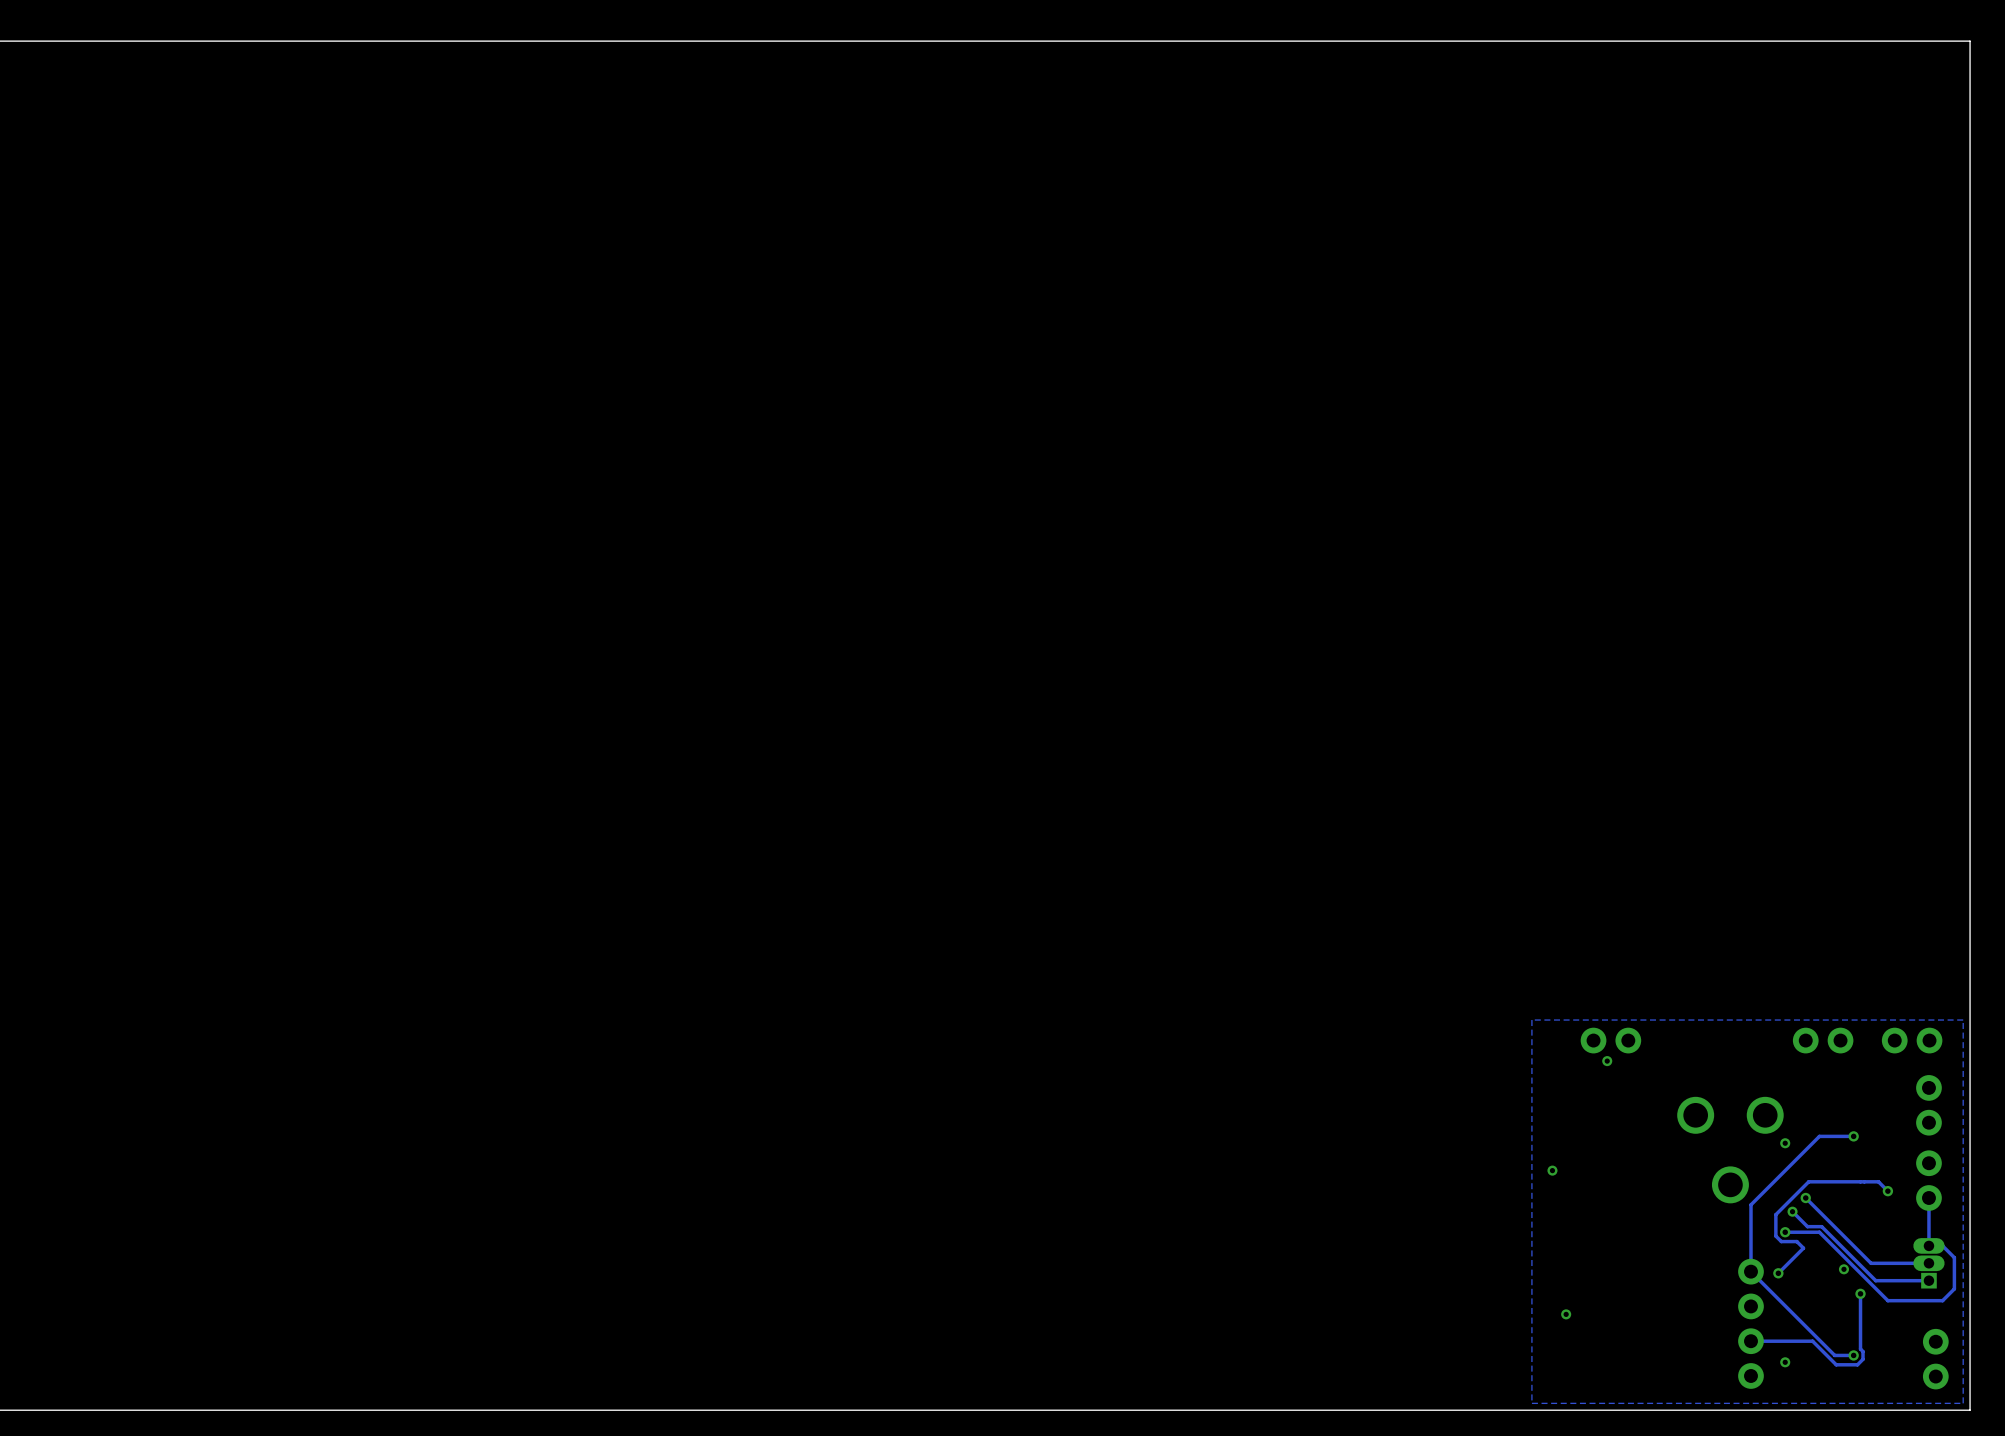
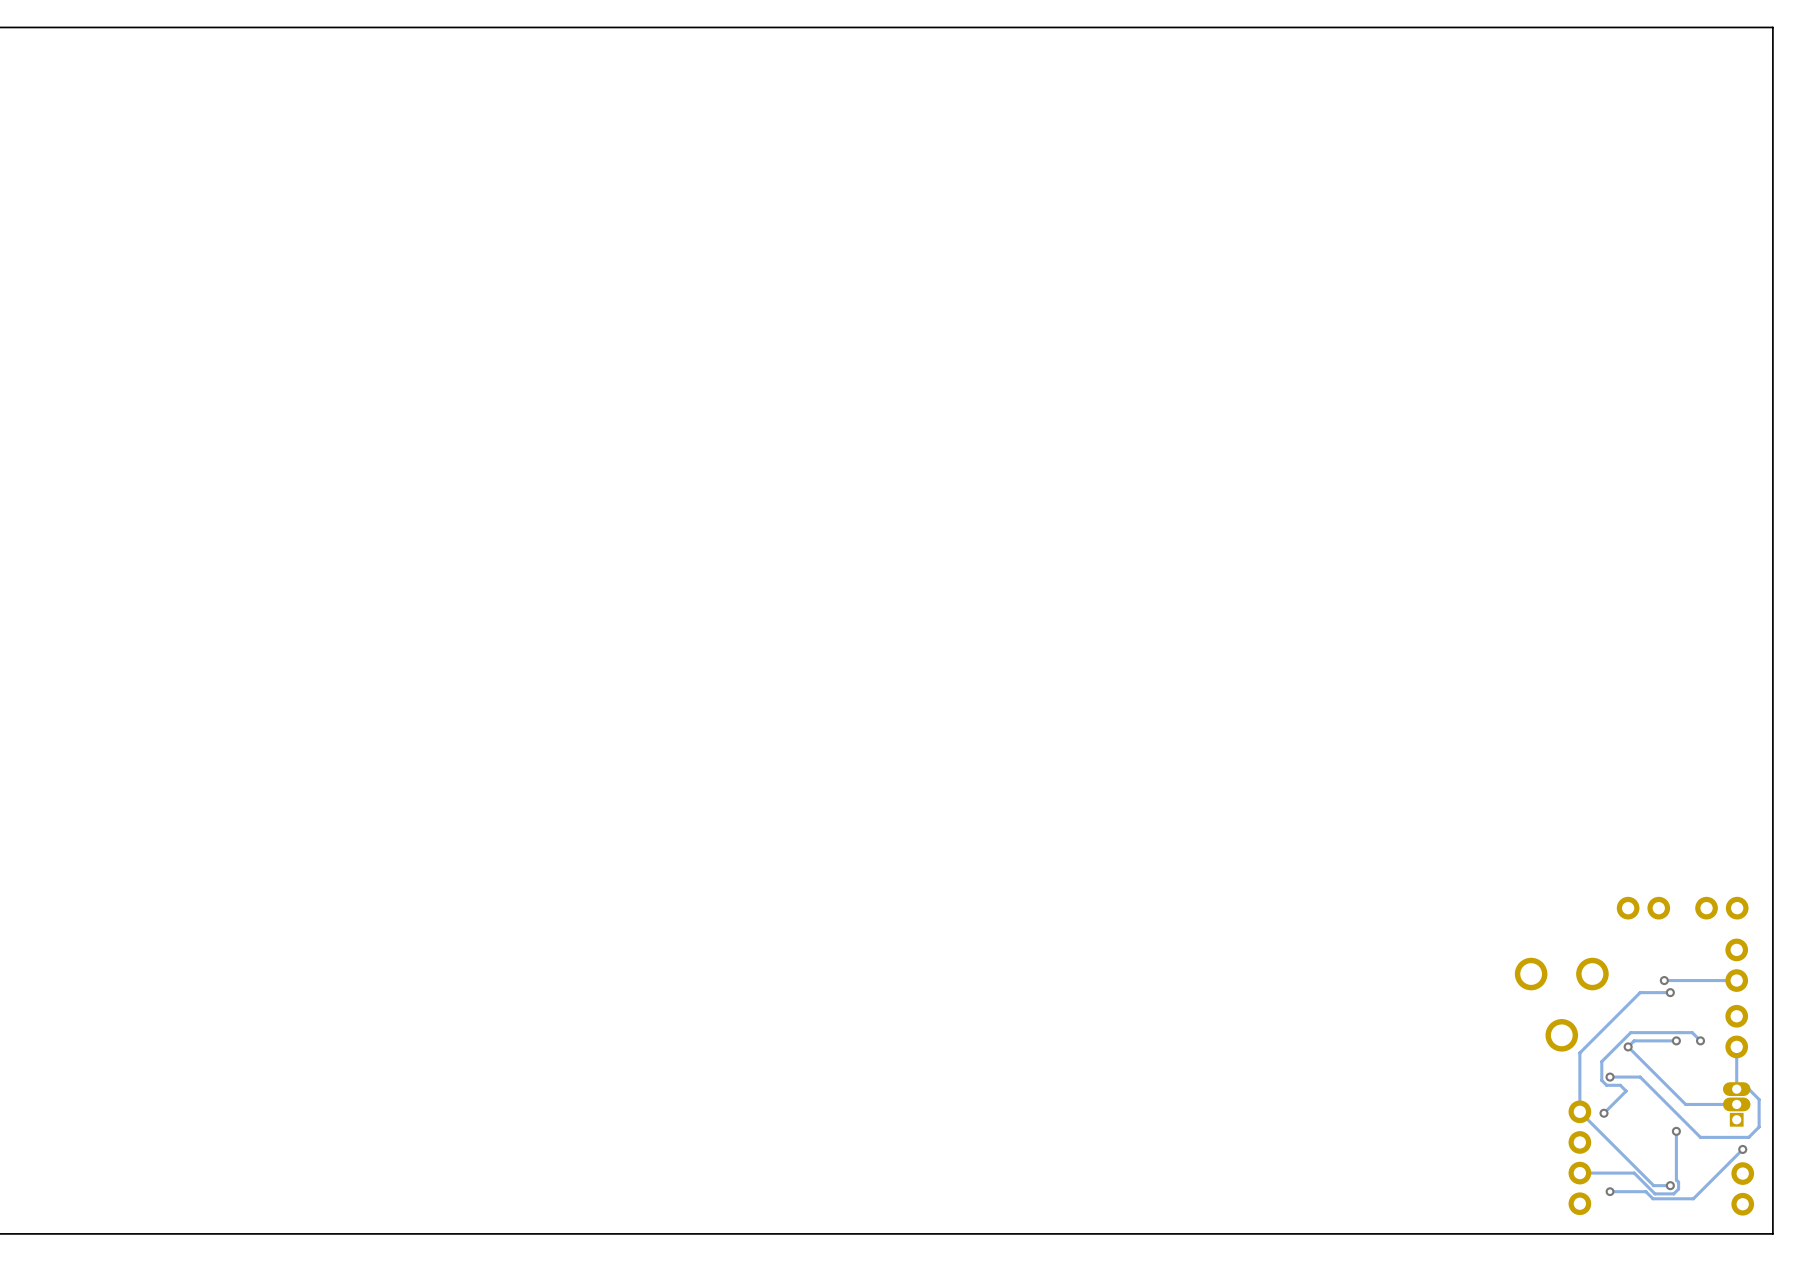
zone outline: (1963, 1020) (1531, 1020) (1531, 1403) (1963, 1403) (1963, 1020) -> none
part: (1610, 1040) -> none
via: (1607, 1061) -> none
via: none -> (1664, 980)
track: none -> (1736, 980) (1664, 980)
via: (1785, 1143) -> none
via: (1552, 1170) -> none
track: none -> (1676, 1040) (1634, 1040) (1628, 1046)
via: none -> (1676, 1040)
track: (1792, 1211) (1807, 1226) (1821, 1226) (1875, 1280) (1928, 1280) -> none
via: (1792, 1211) -> none
via: (1843, 1269) -> none
via: (1566, 1314) -> none
track: none -> (1742, 1149) (1693, 1198) (1652, 1198) (1645, 1191) (1610, 1191)
via: none -> (1742, 1149)

